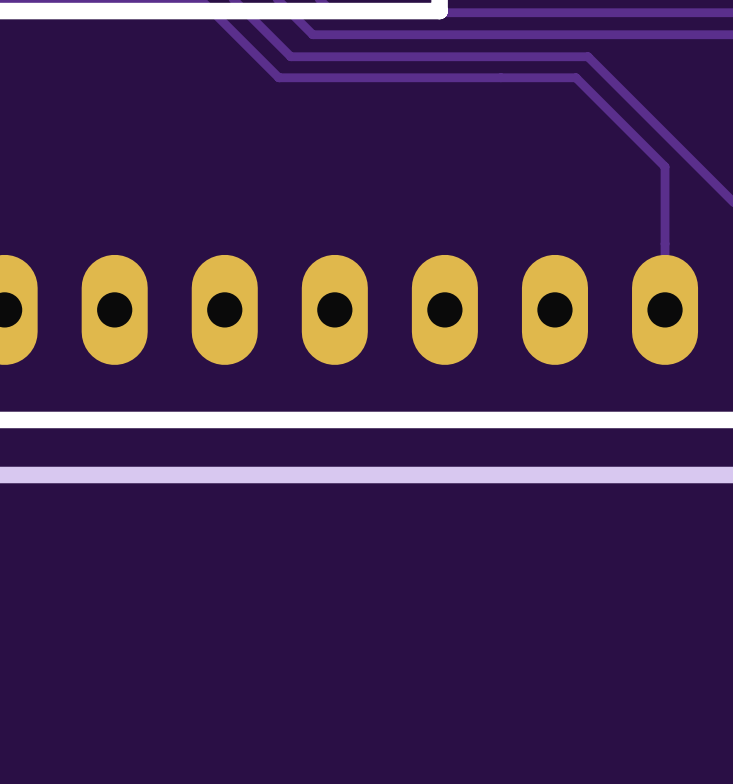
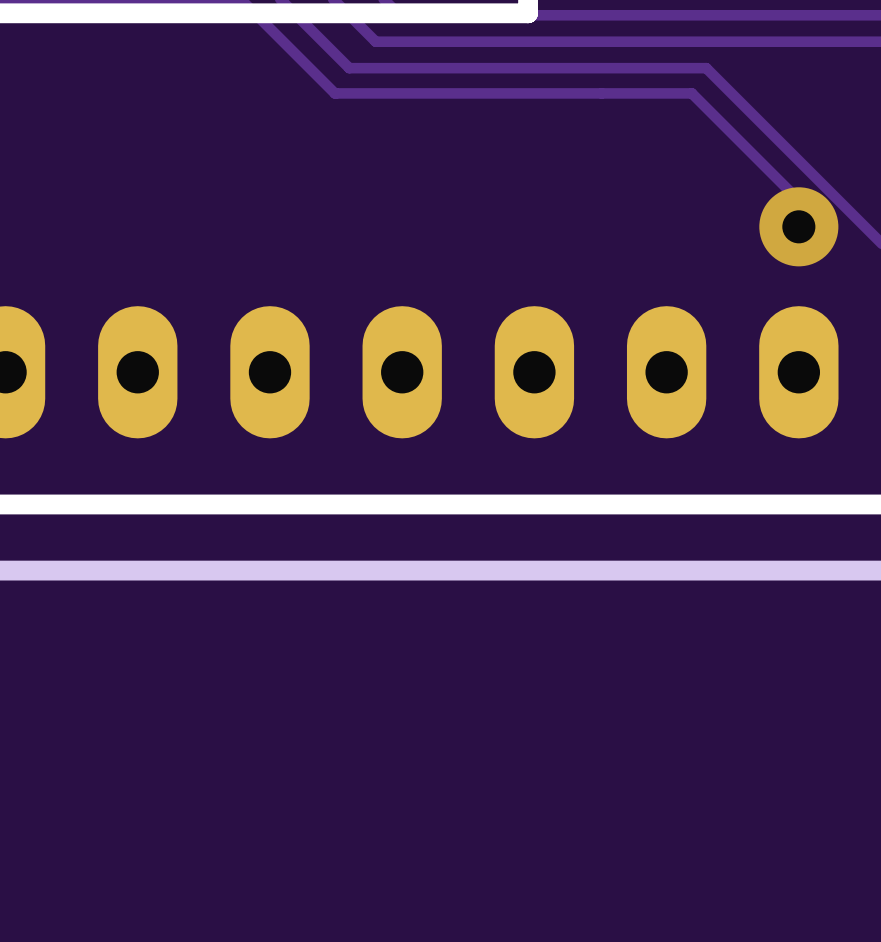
track: (665, 188) (665, 309) -> none
via: none -> (798, 226)

